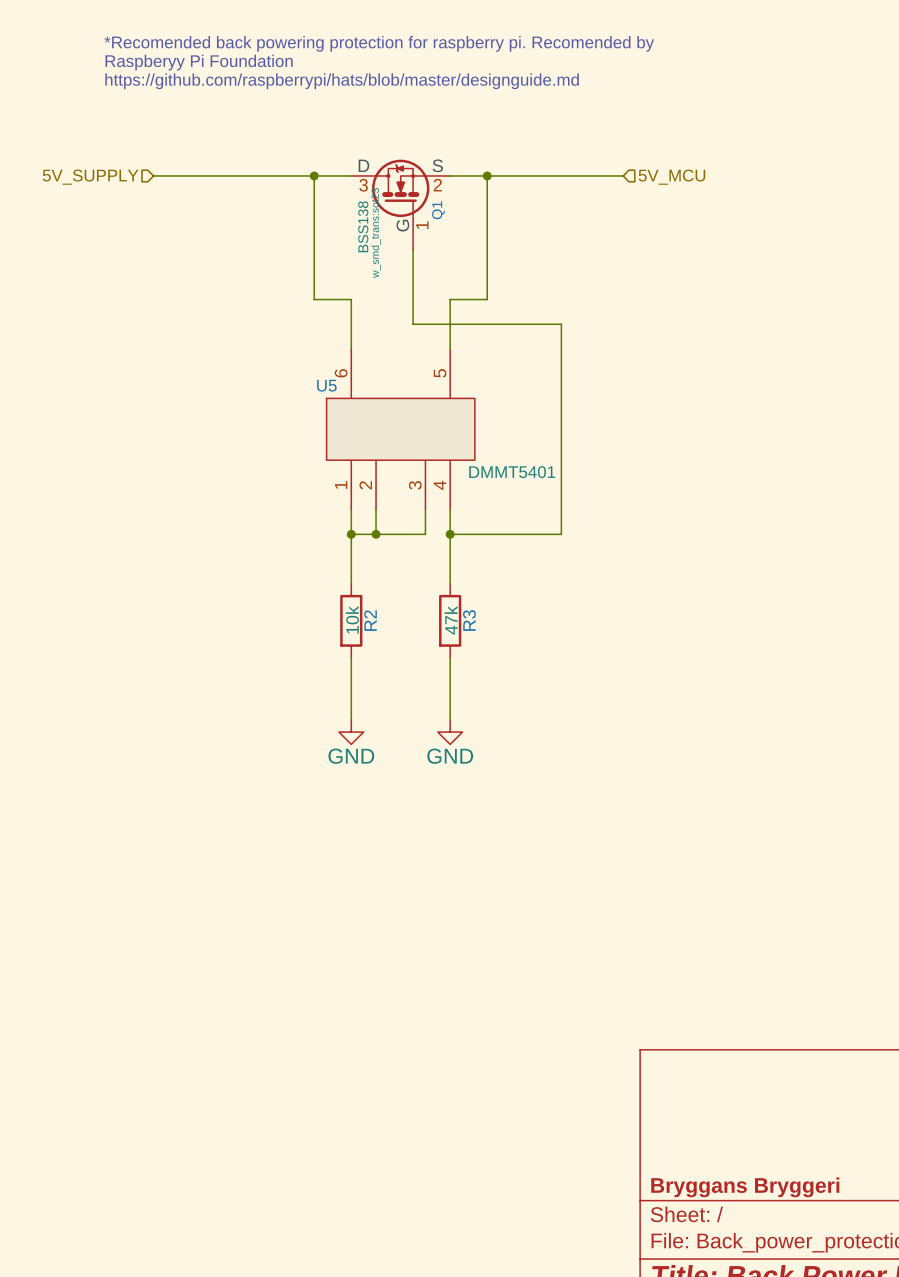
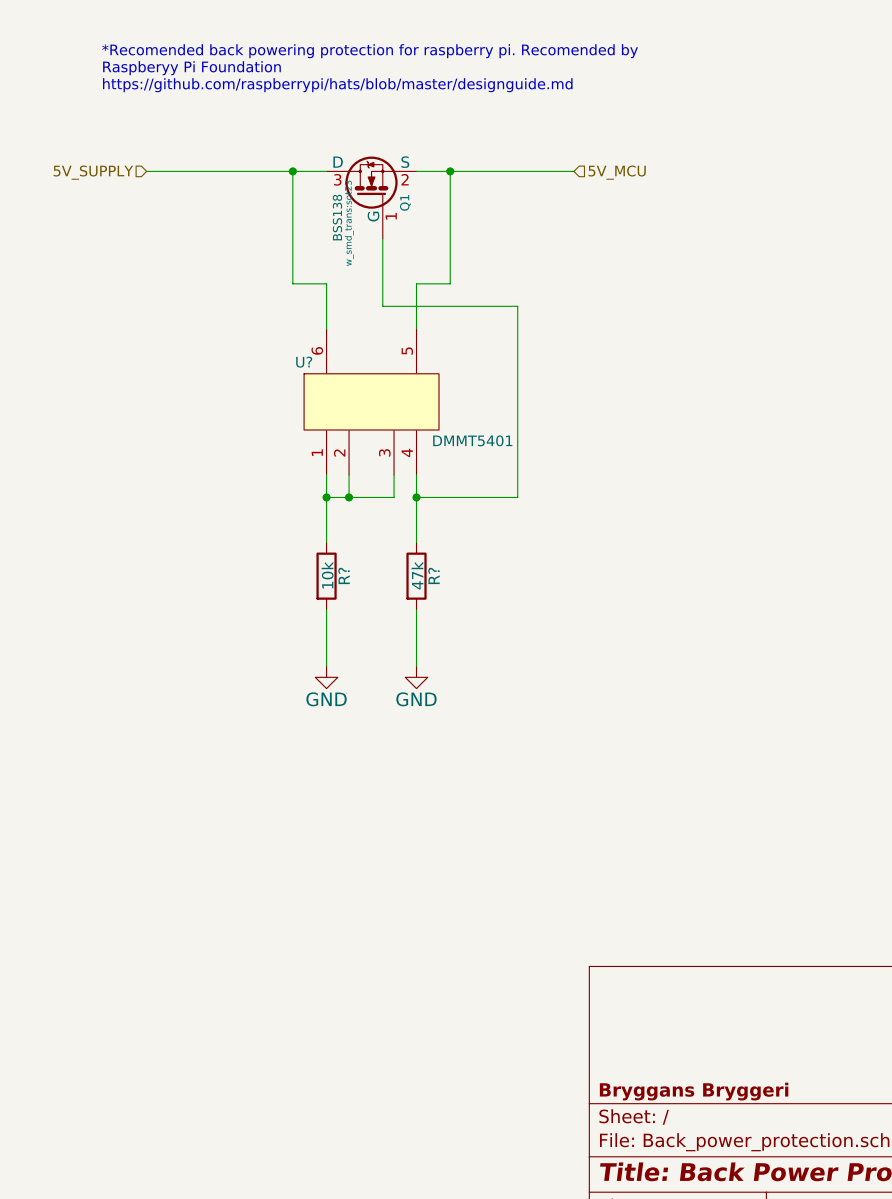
U5 name: U5 (326, 385) -> U? (304, 362)
R2 name: R2 (370, 620) -> R? (344, 575)
R3 name: R3 (469, 620) -> R? (433, 575)

